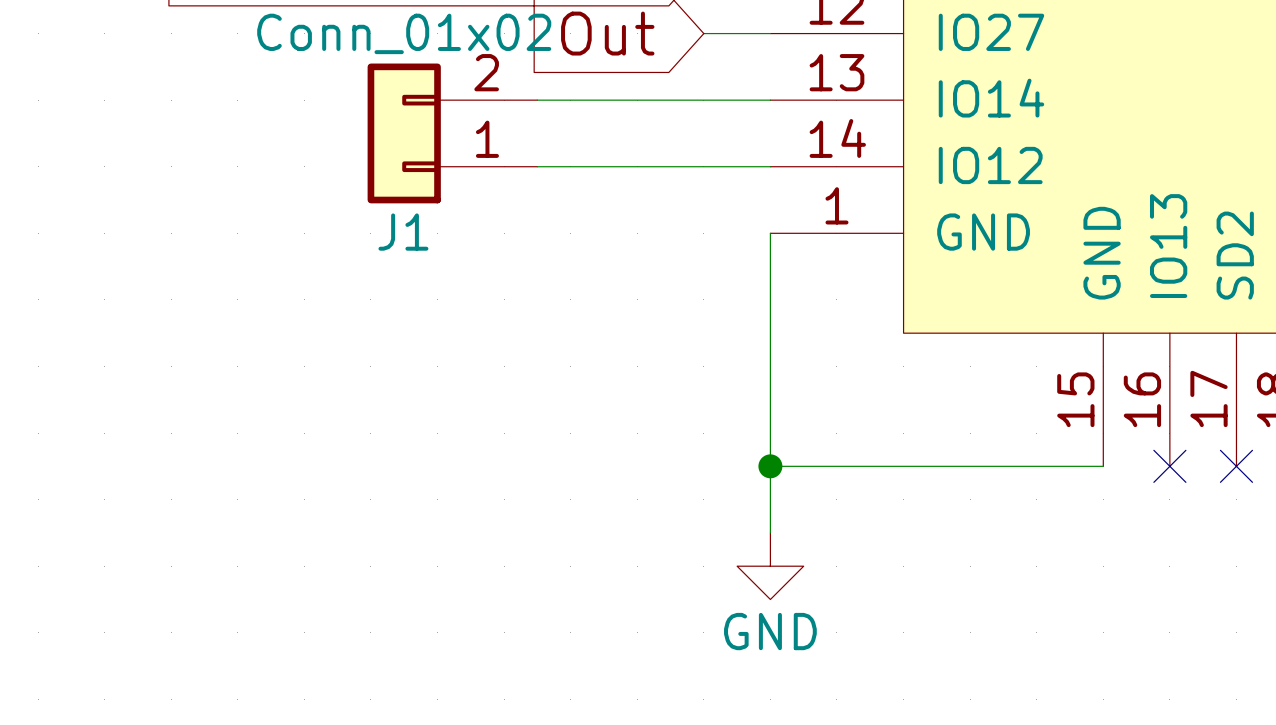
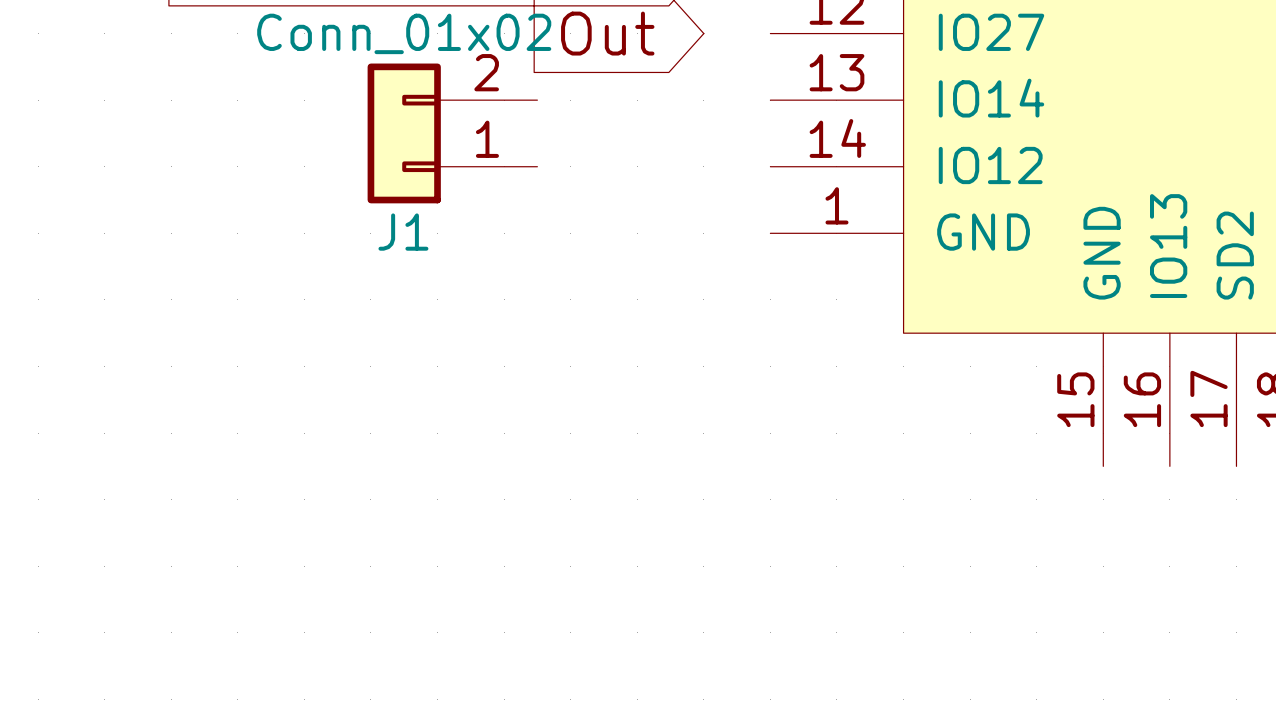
wire: (703, 33) (770, 33) -> none
wire: (537, 100) (770, 100) -> none
wire: (537, 166) (770, 166) -> none
wire: (770, 233) (770, 532) -> none
wire: (770, 466) (1103, 466) -> none
junction: (770, 466) -> none
no-connect mark: (1169, 466) -> none
no-connect mark: (1236, 466) -> none
power symbol: GND (770, 566) -> none

